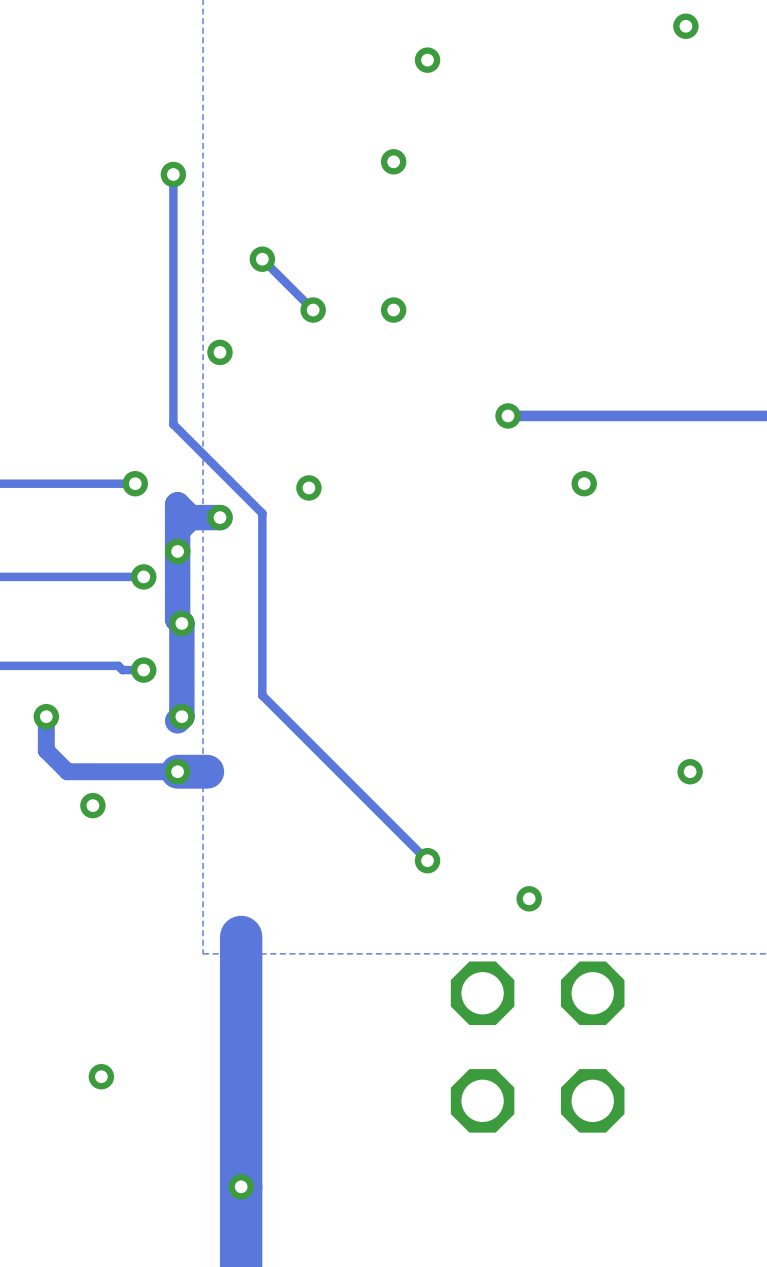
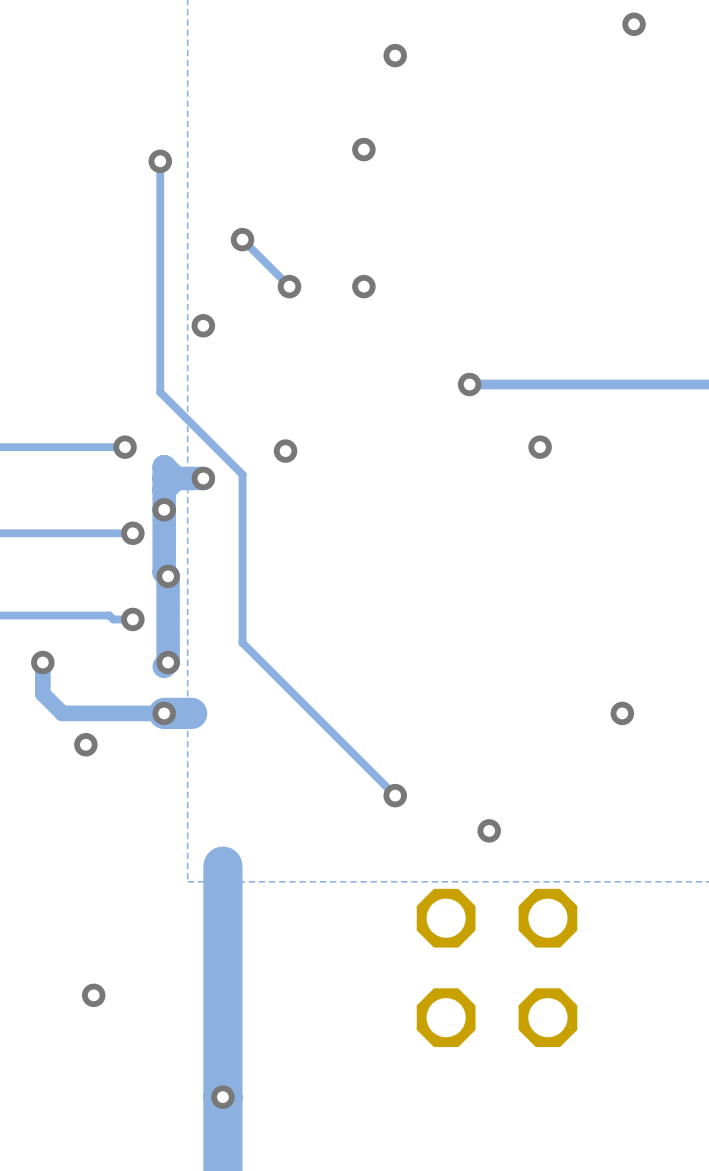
via position: (690, 771) -> (622, 713)

